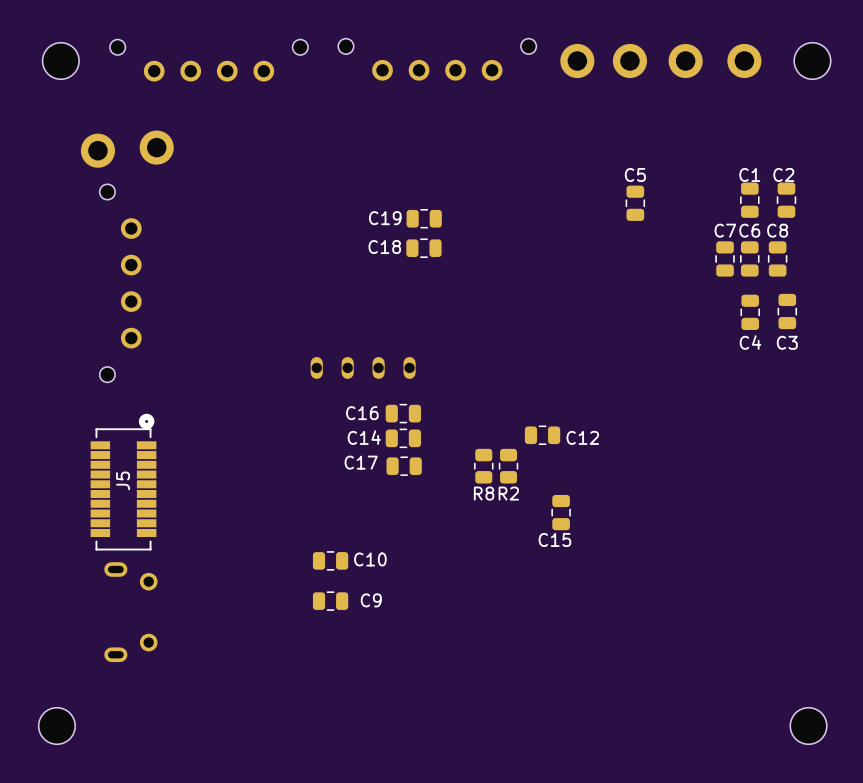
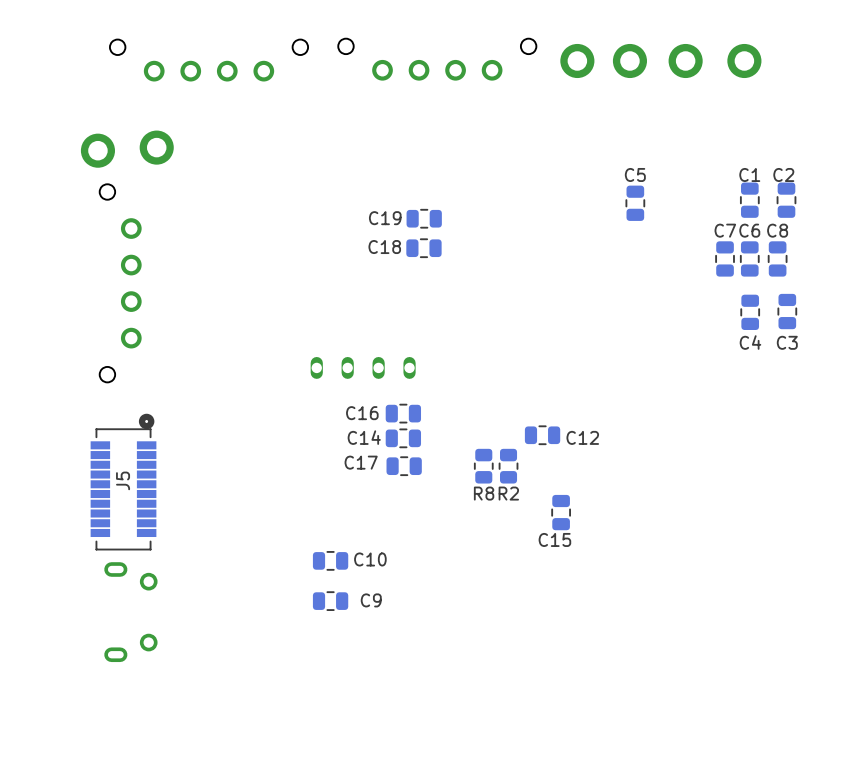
part: (60, 60) -> none
part: (812, 60) -> none
part: (56, 726) -> none
part: (808, 726) -> none

